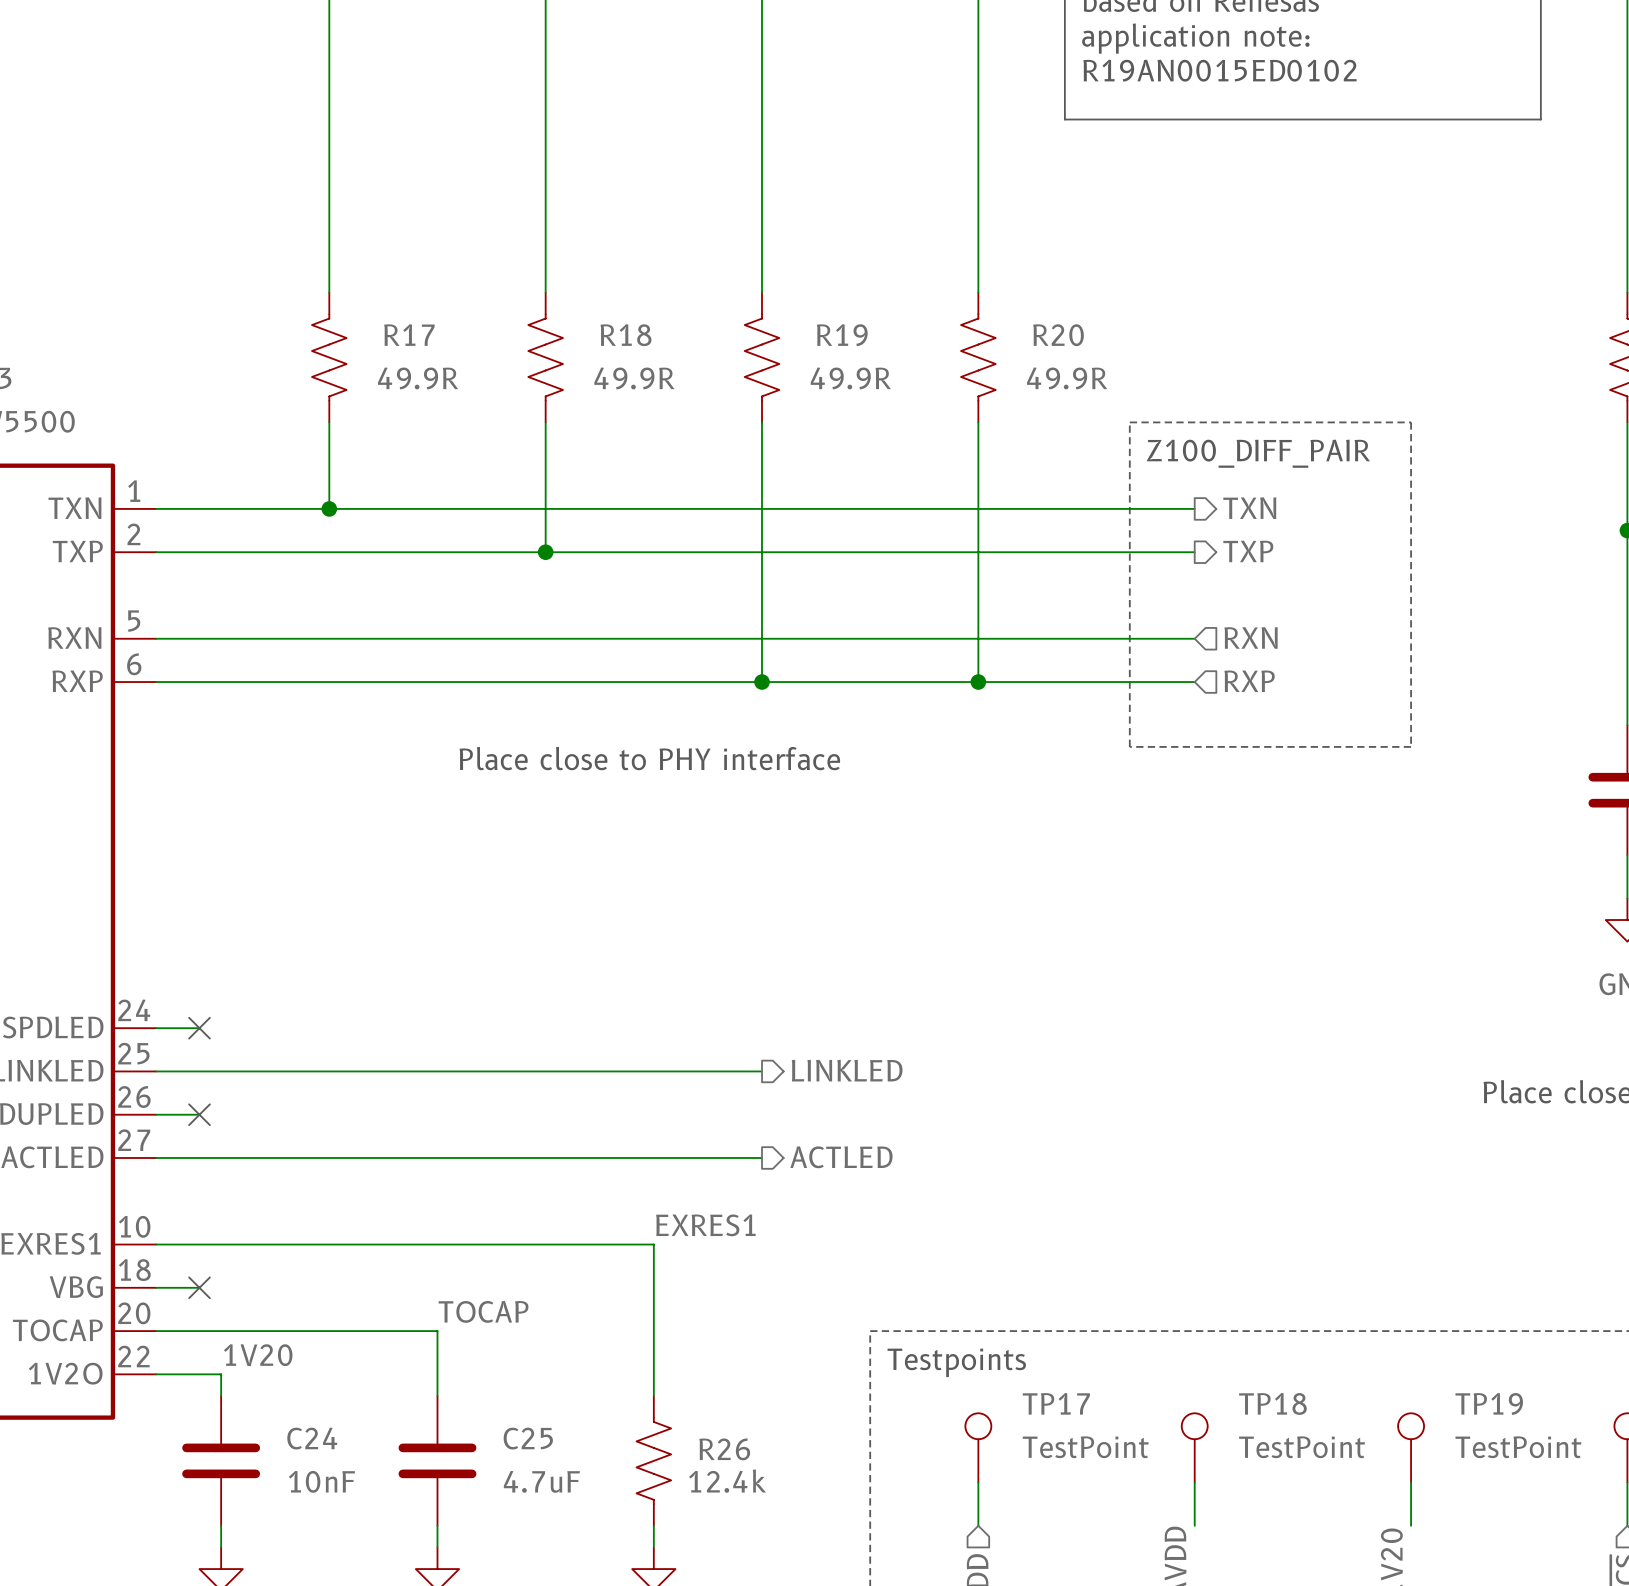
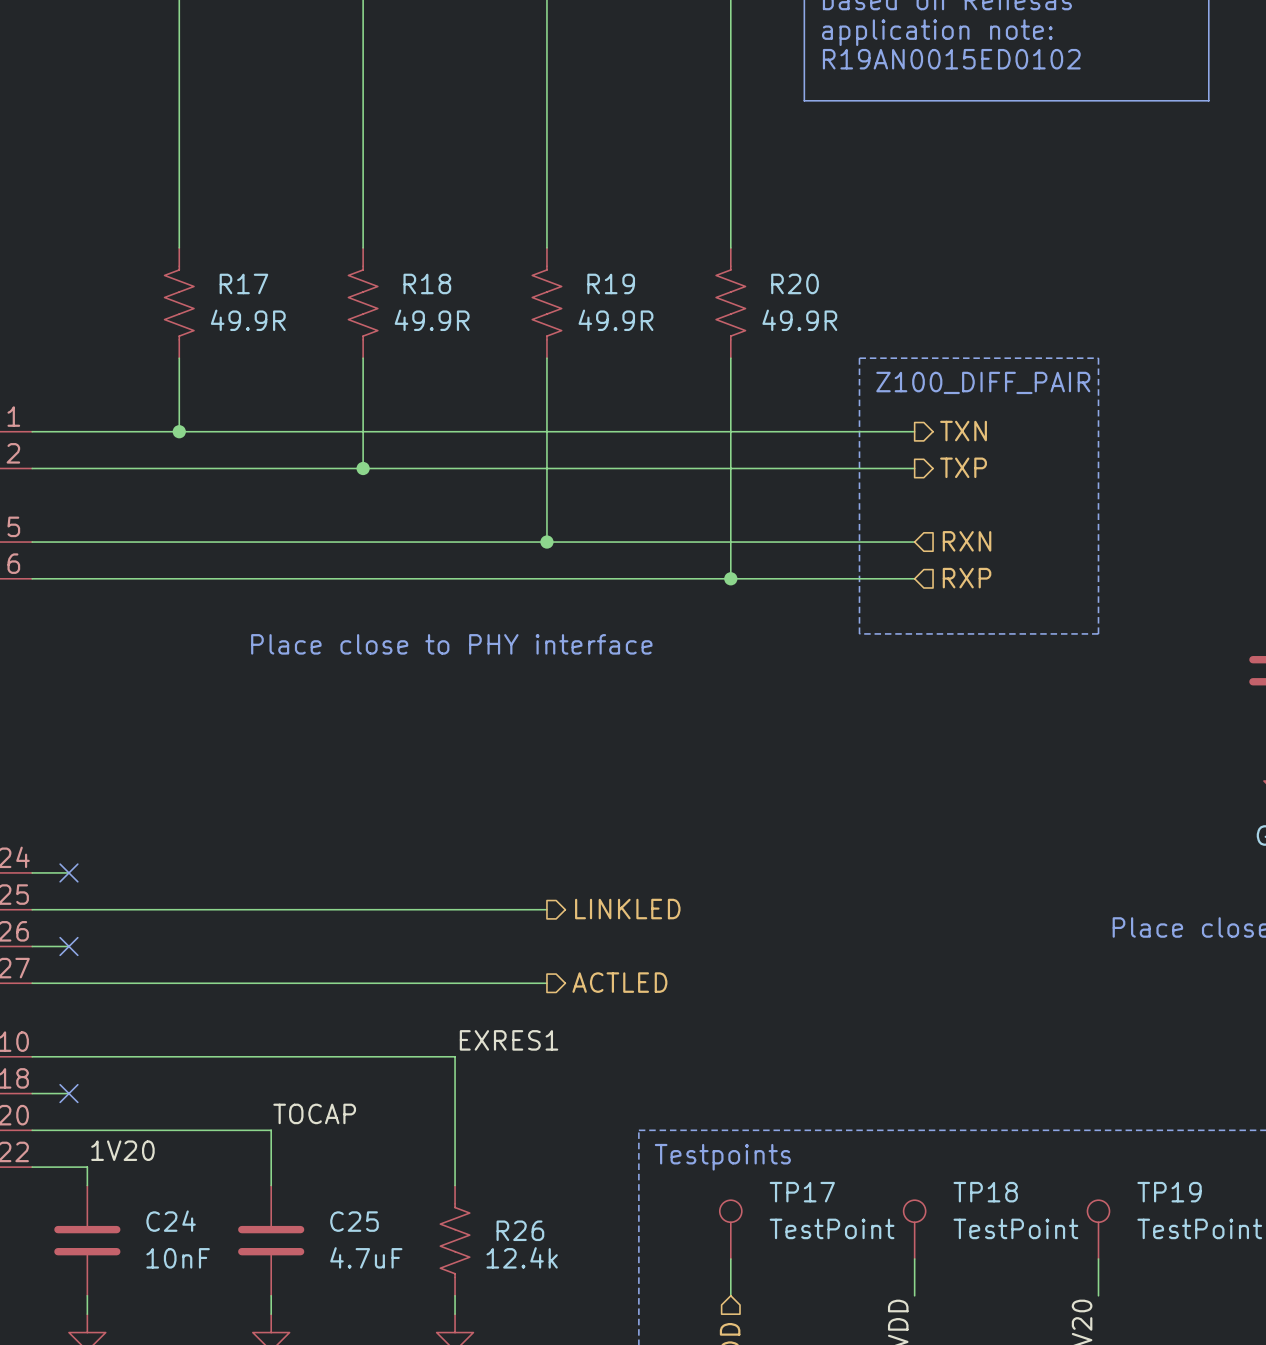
wire: (762, 638) (762, 682) -> none
junction position: (762, 682) -> (546, 542)

